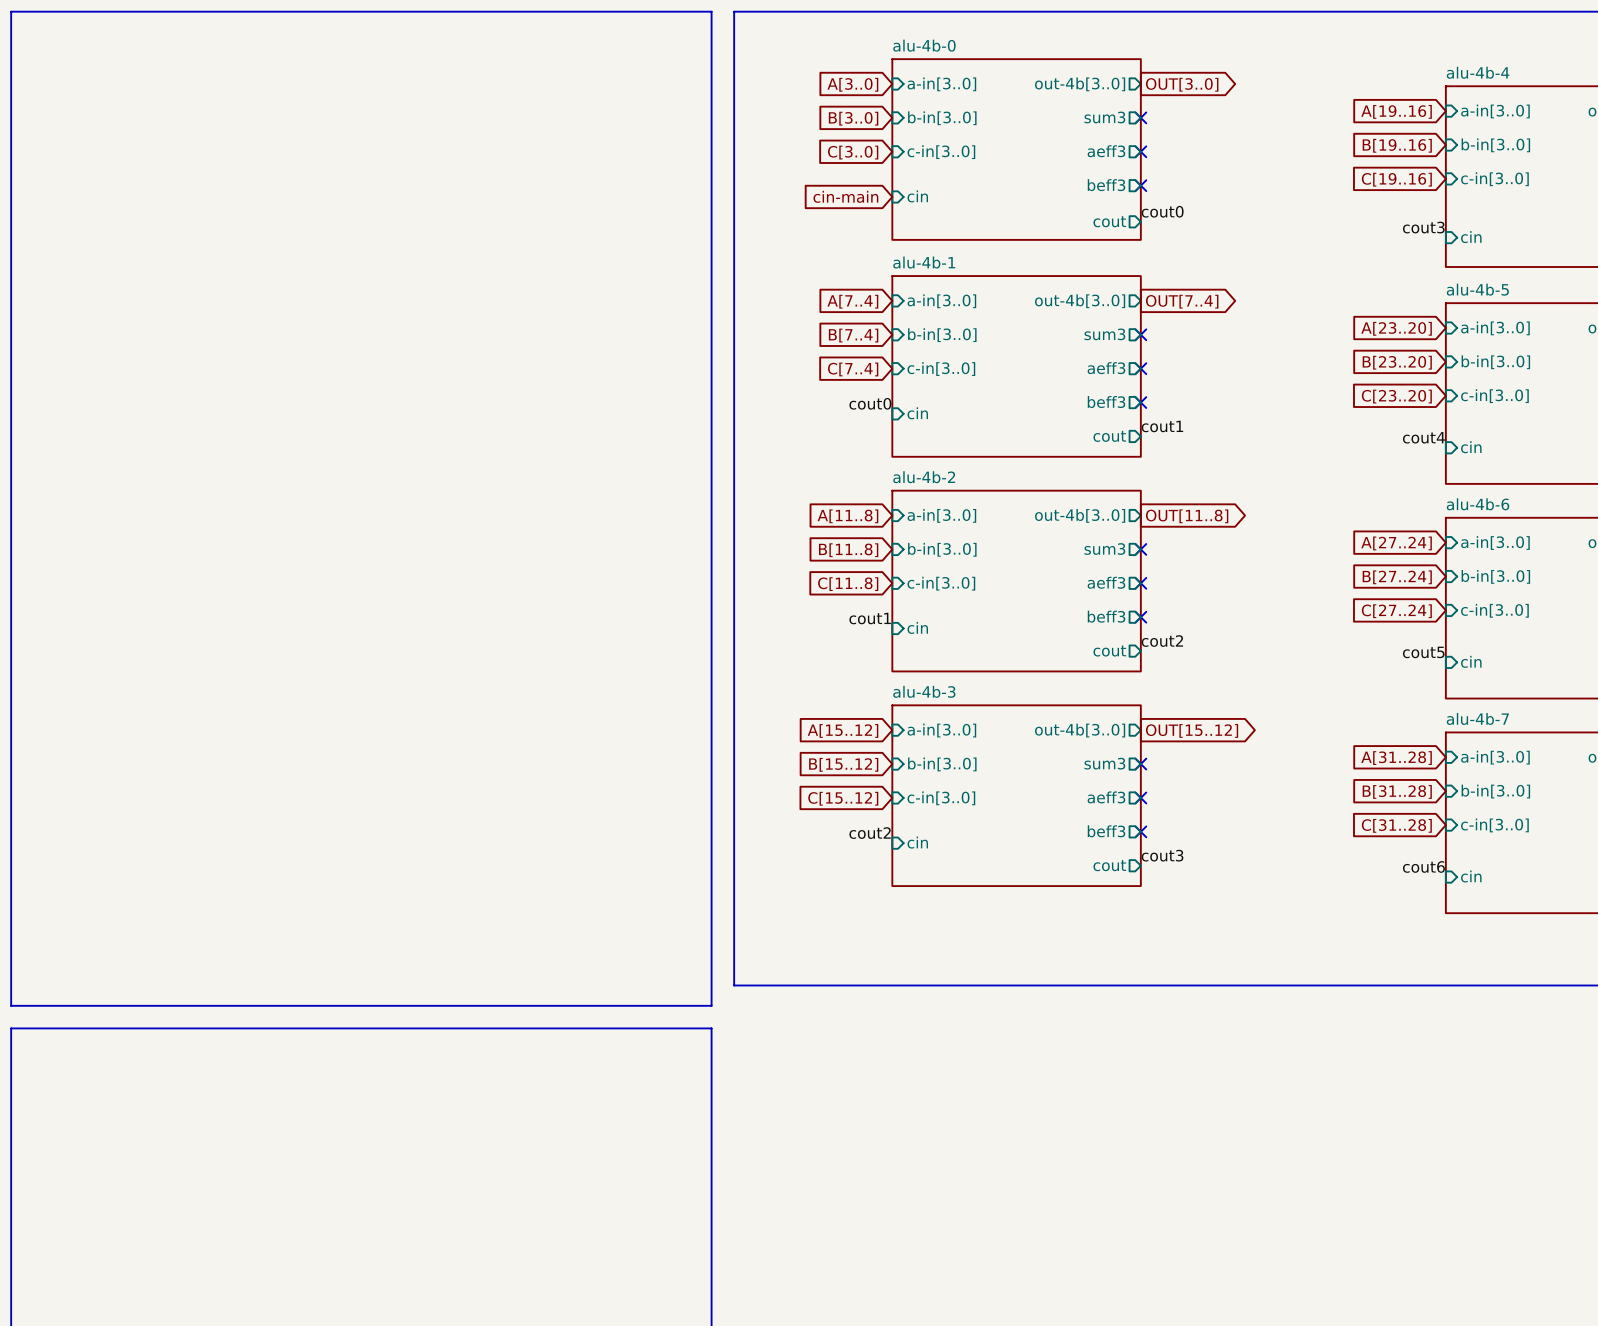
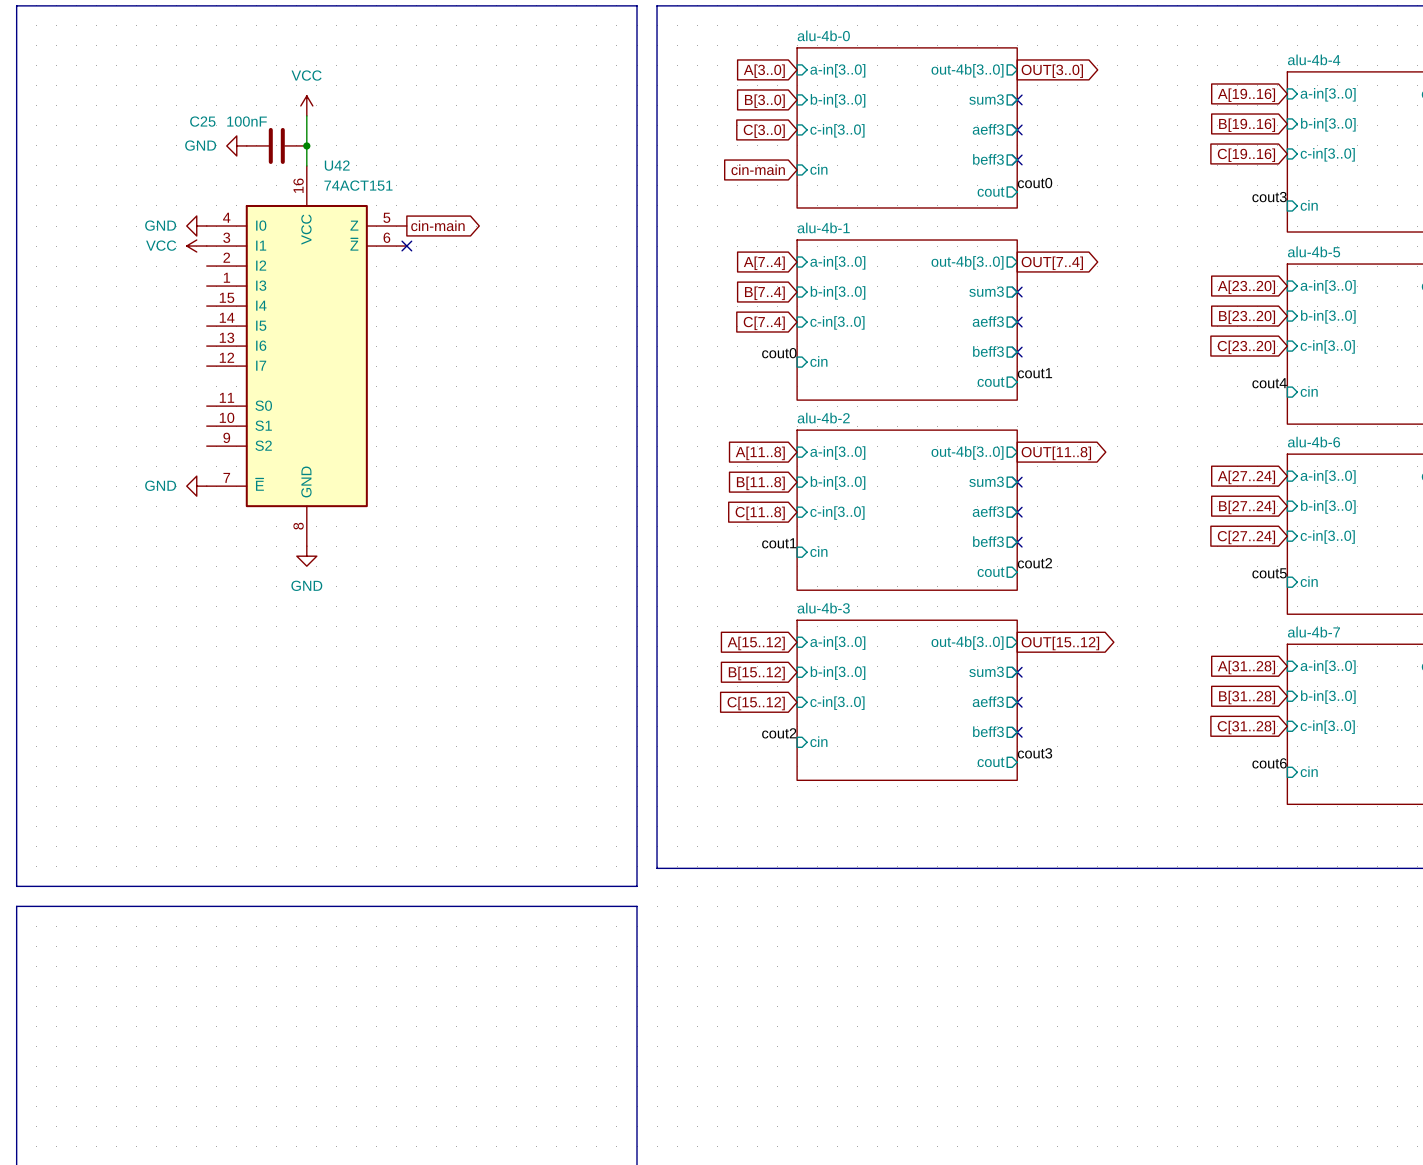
power symbol: none -> VCC (306, 105)
wire: none -> (306, 115) (306, 165)
power symbol: none -> GND (236, 145)
C25: none -> 100nF (276, 145)
junction: none -> (306, 145)
power symbol: none -> GND (196, 226)
global label: none -> cin-main (437, 225)
power symbol: none -> VCC (196, 246)
no-connect mark: none -> (406, 246)
U42: none -> 74ACT151 (306, 356)
power symbol: none -> GND (196, 486)
power symbol: none -> GND (306, 556)

